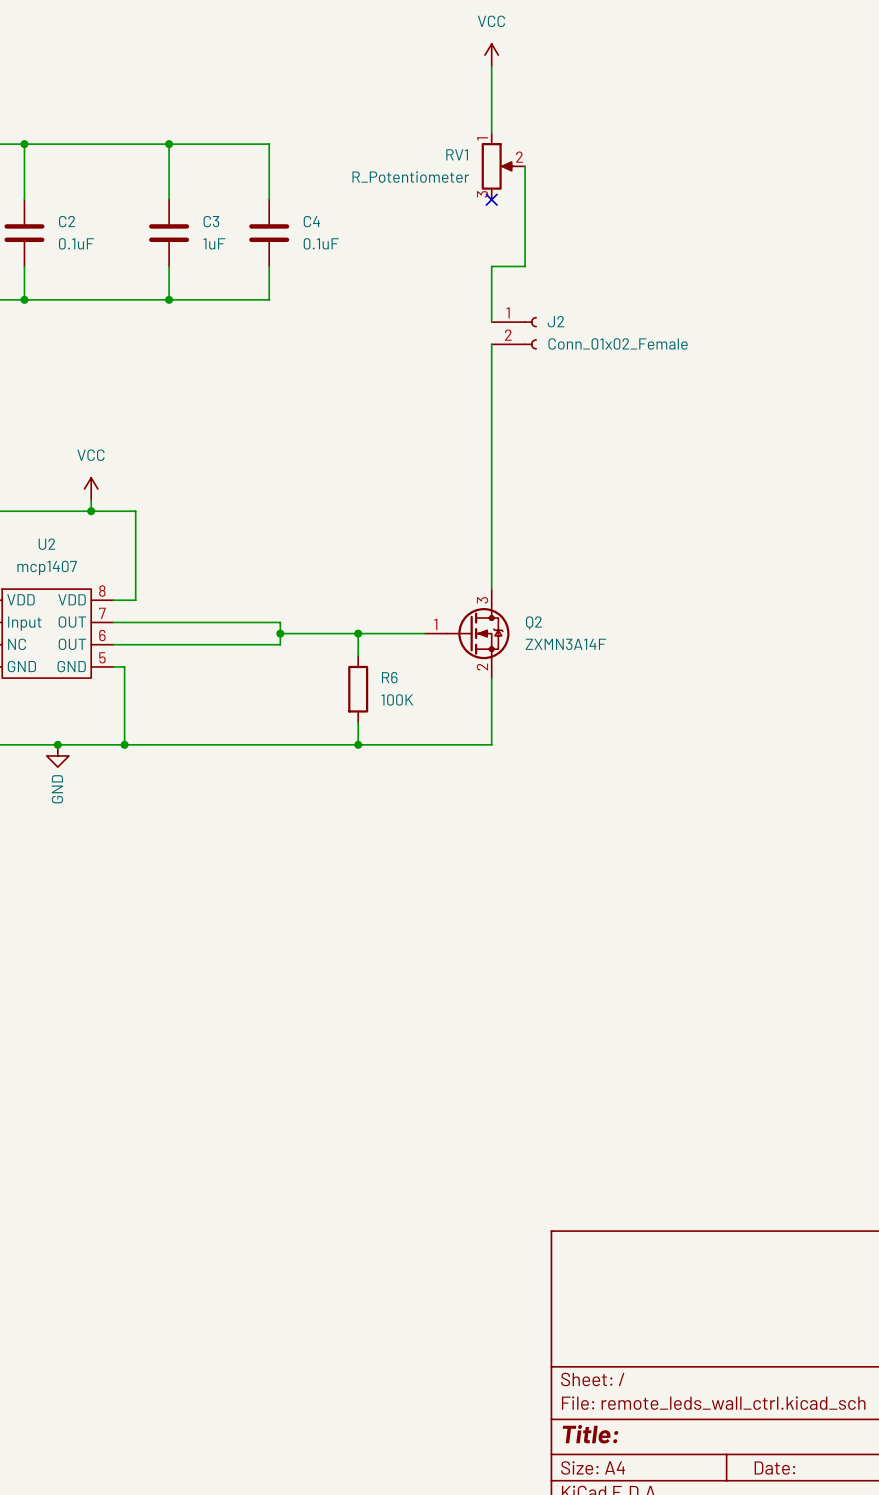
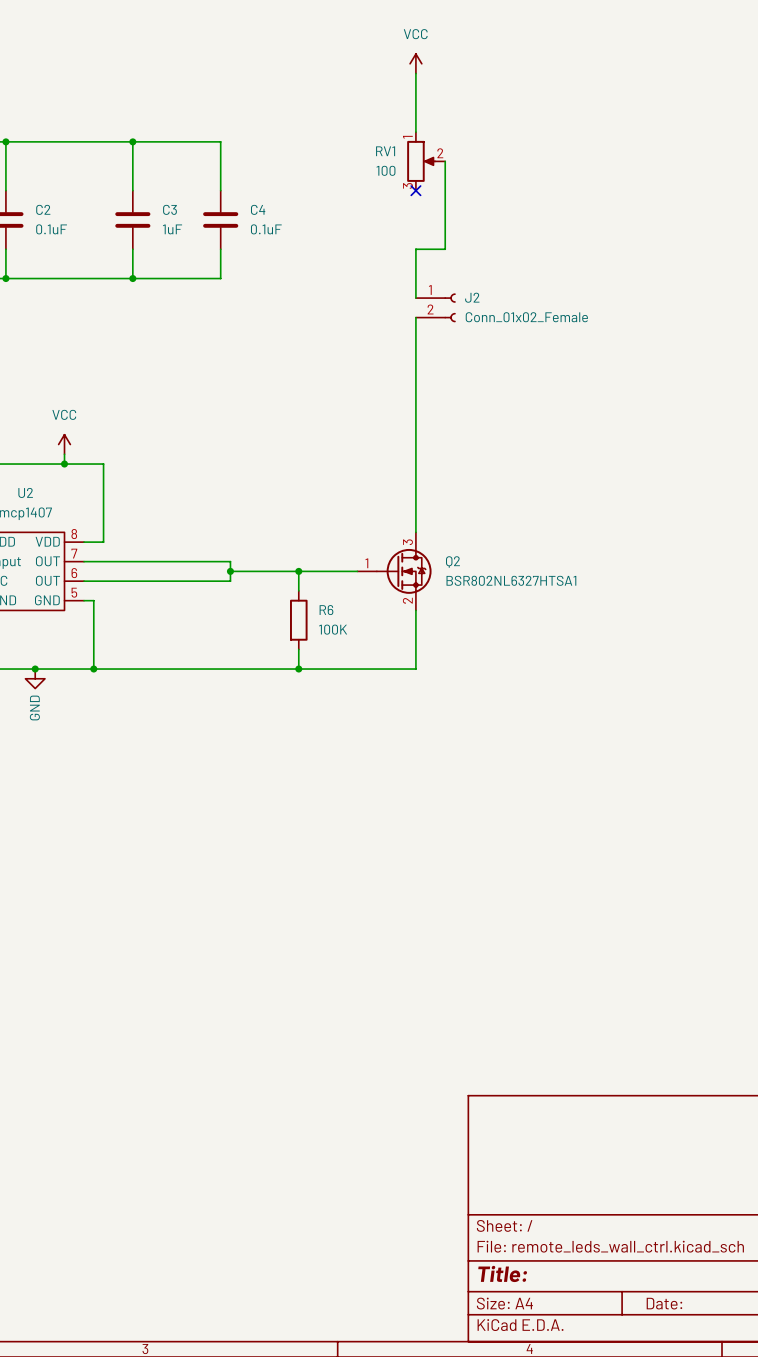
RV1 value: R_Potentiometer (410, 177) -> 100 (385, 170)
Q2 value: ZXMN3A14F (565, 644) -> BSR802NL6327HTSA1 (511, 580)

